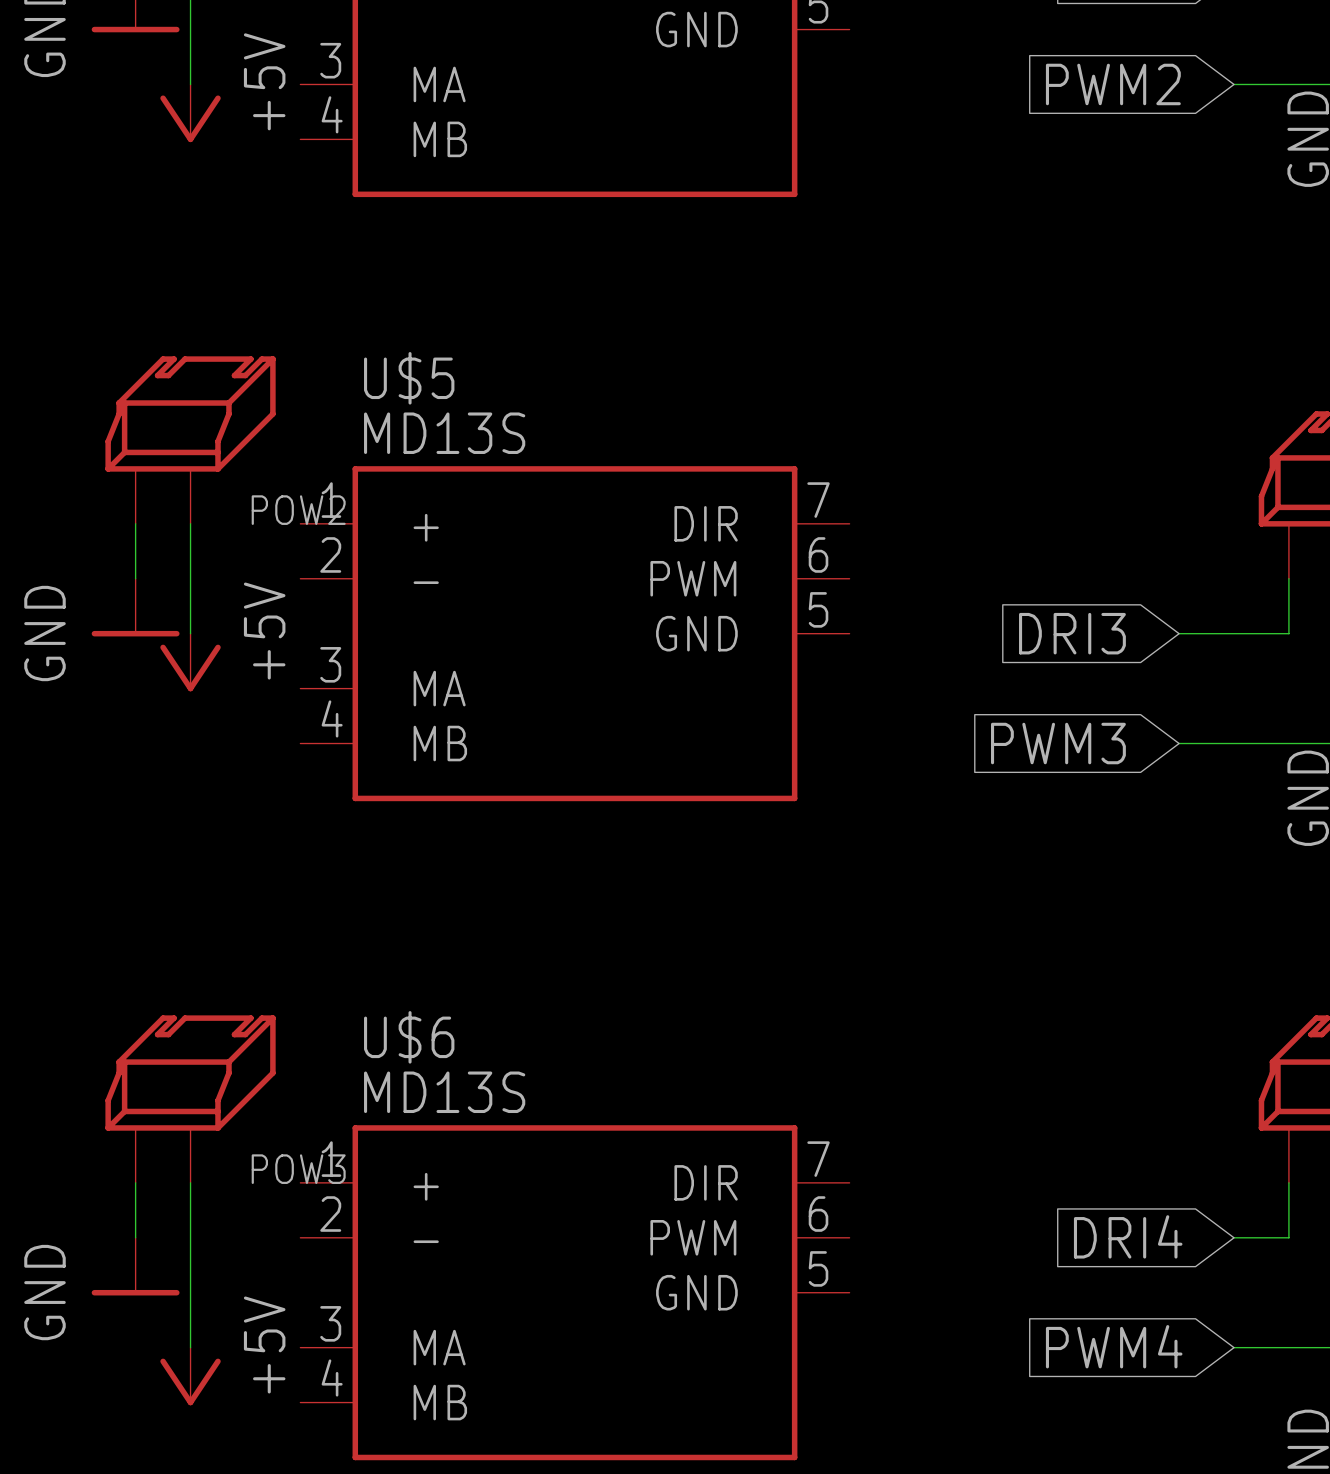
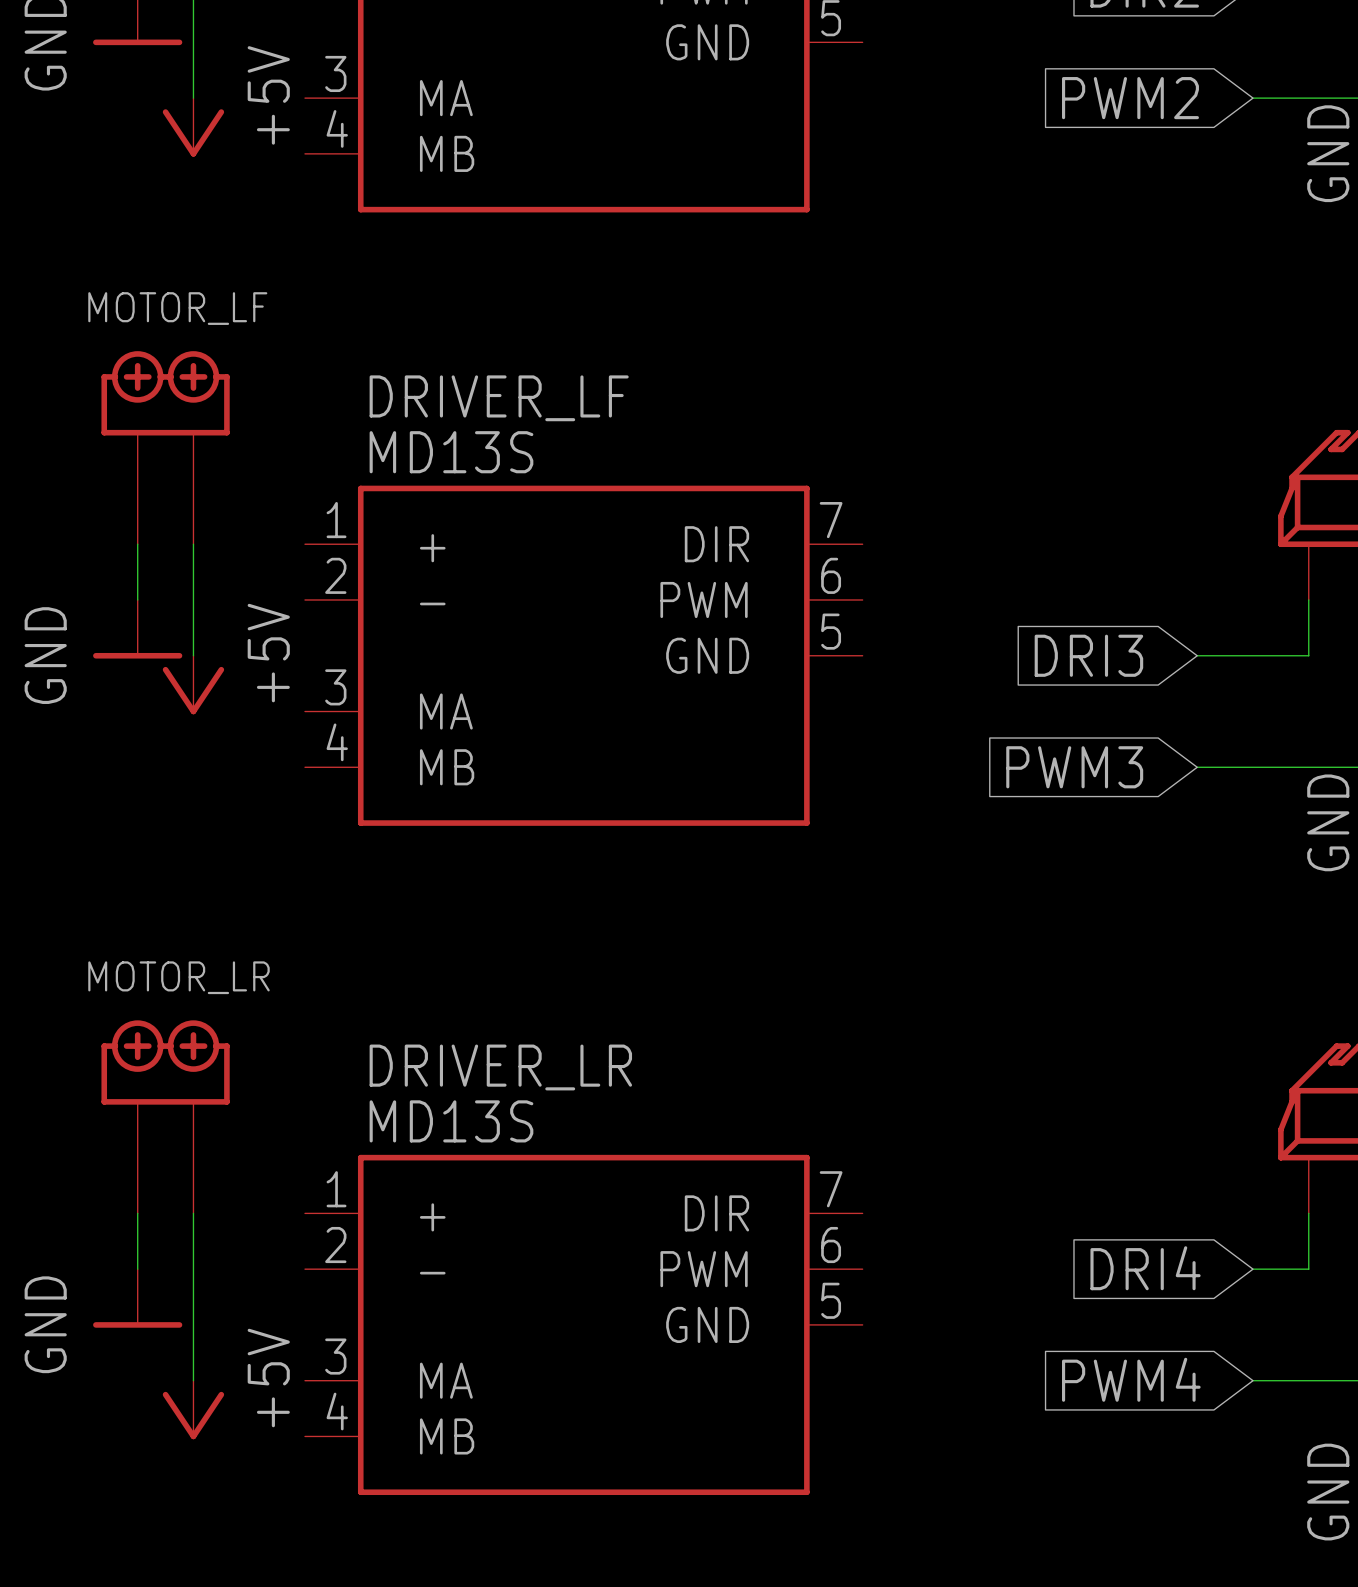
U$5 name: U$5 (409, 378) -> DRIVER_LF (499, 398)
MOTOR_LF: none -> (165, 447)
POW2: (190, 440) -> none
U$6 name: U$6 (409, 1037) -> DRIVER_LR (500, 1067)
MOTOR_LR: none -> (165, 1116)
POW3: (190, 1099) -> none

